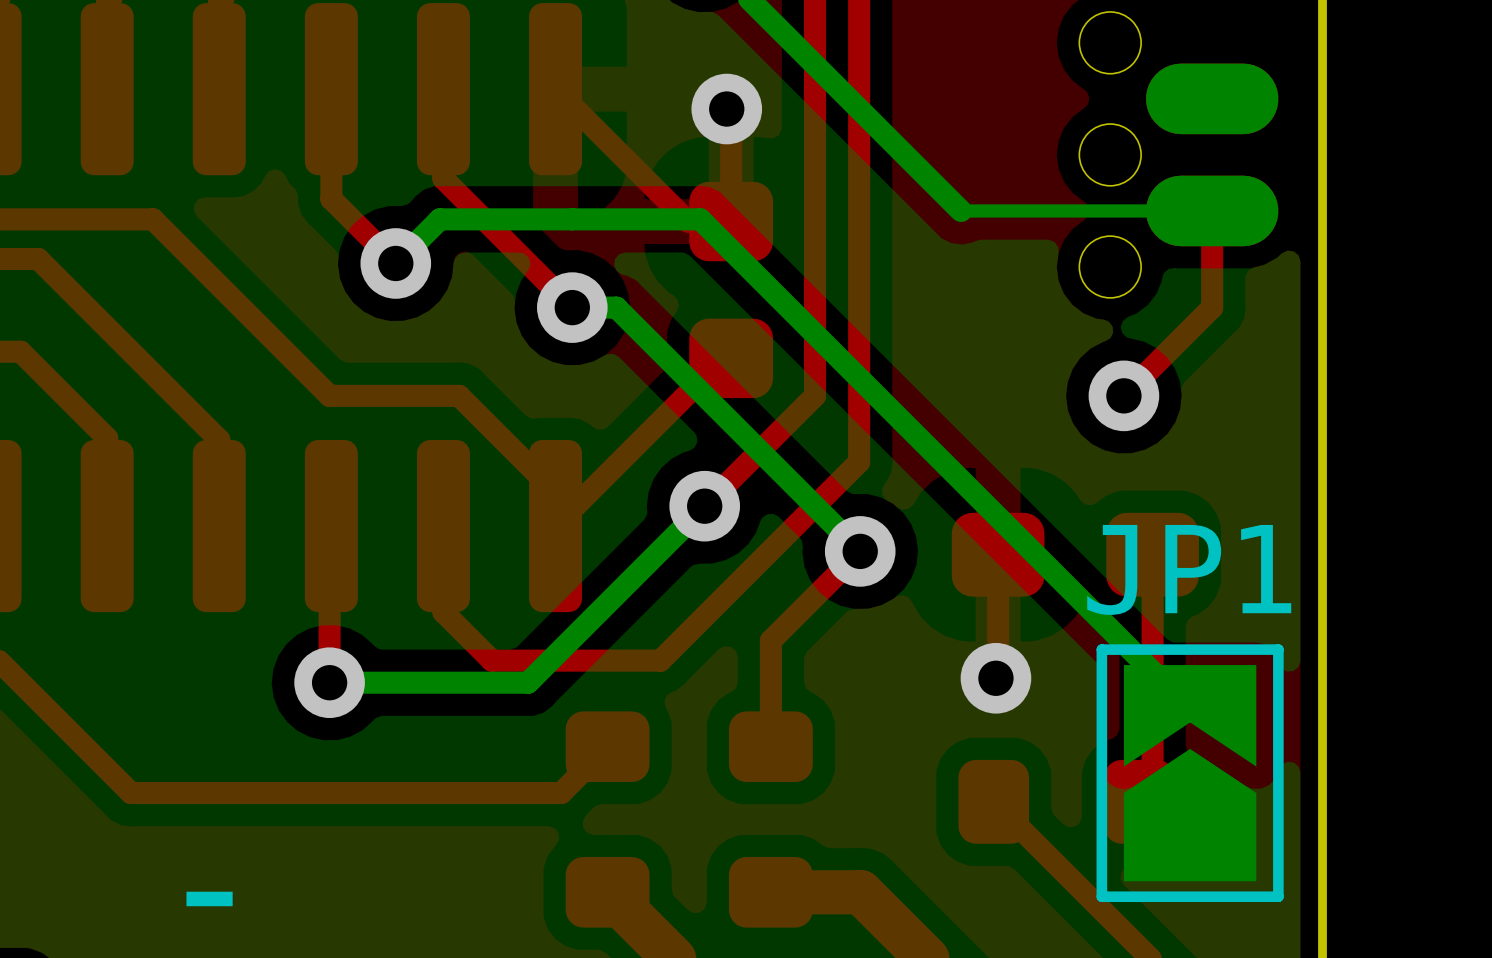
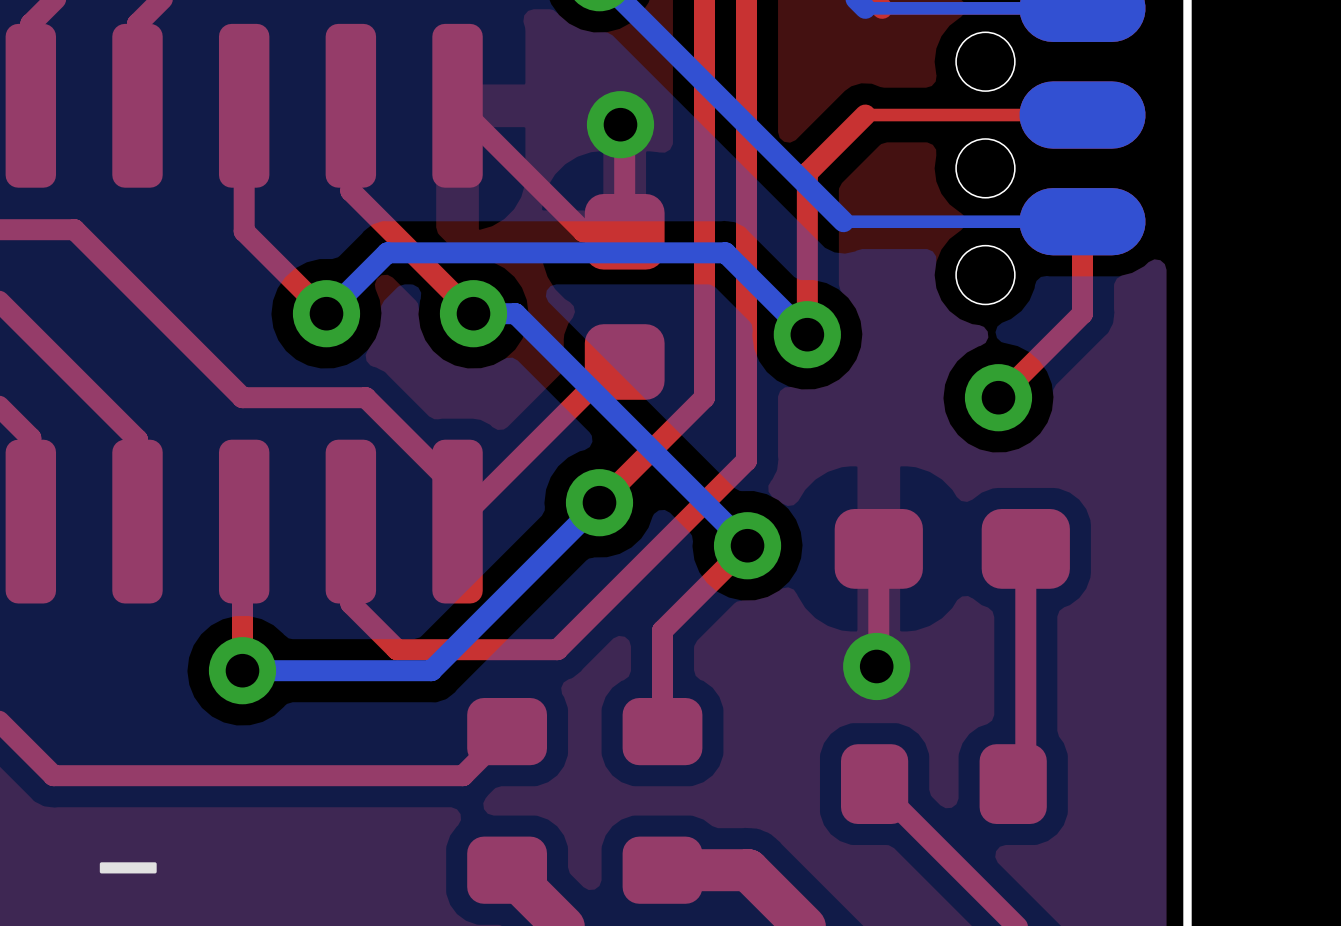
top track: none -> (1040, 115) (865, 115) (807, 173) (807, 334)
top track: (331, 199) (395, 263) -> (244, 210) (244, 231) (326, 313)
bottom track: (395, 263) (439, 219) (700, 219) (1190, 709) -> none
via position: (395, 263) -> (326, 313)
bottom track: none -> (326, 313) (387, 252) (725, 252) (807, 334)
via: none -> (807, 334)
JP1: (1190, 773) -> none

